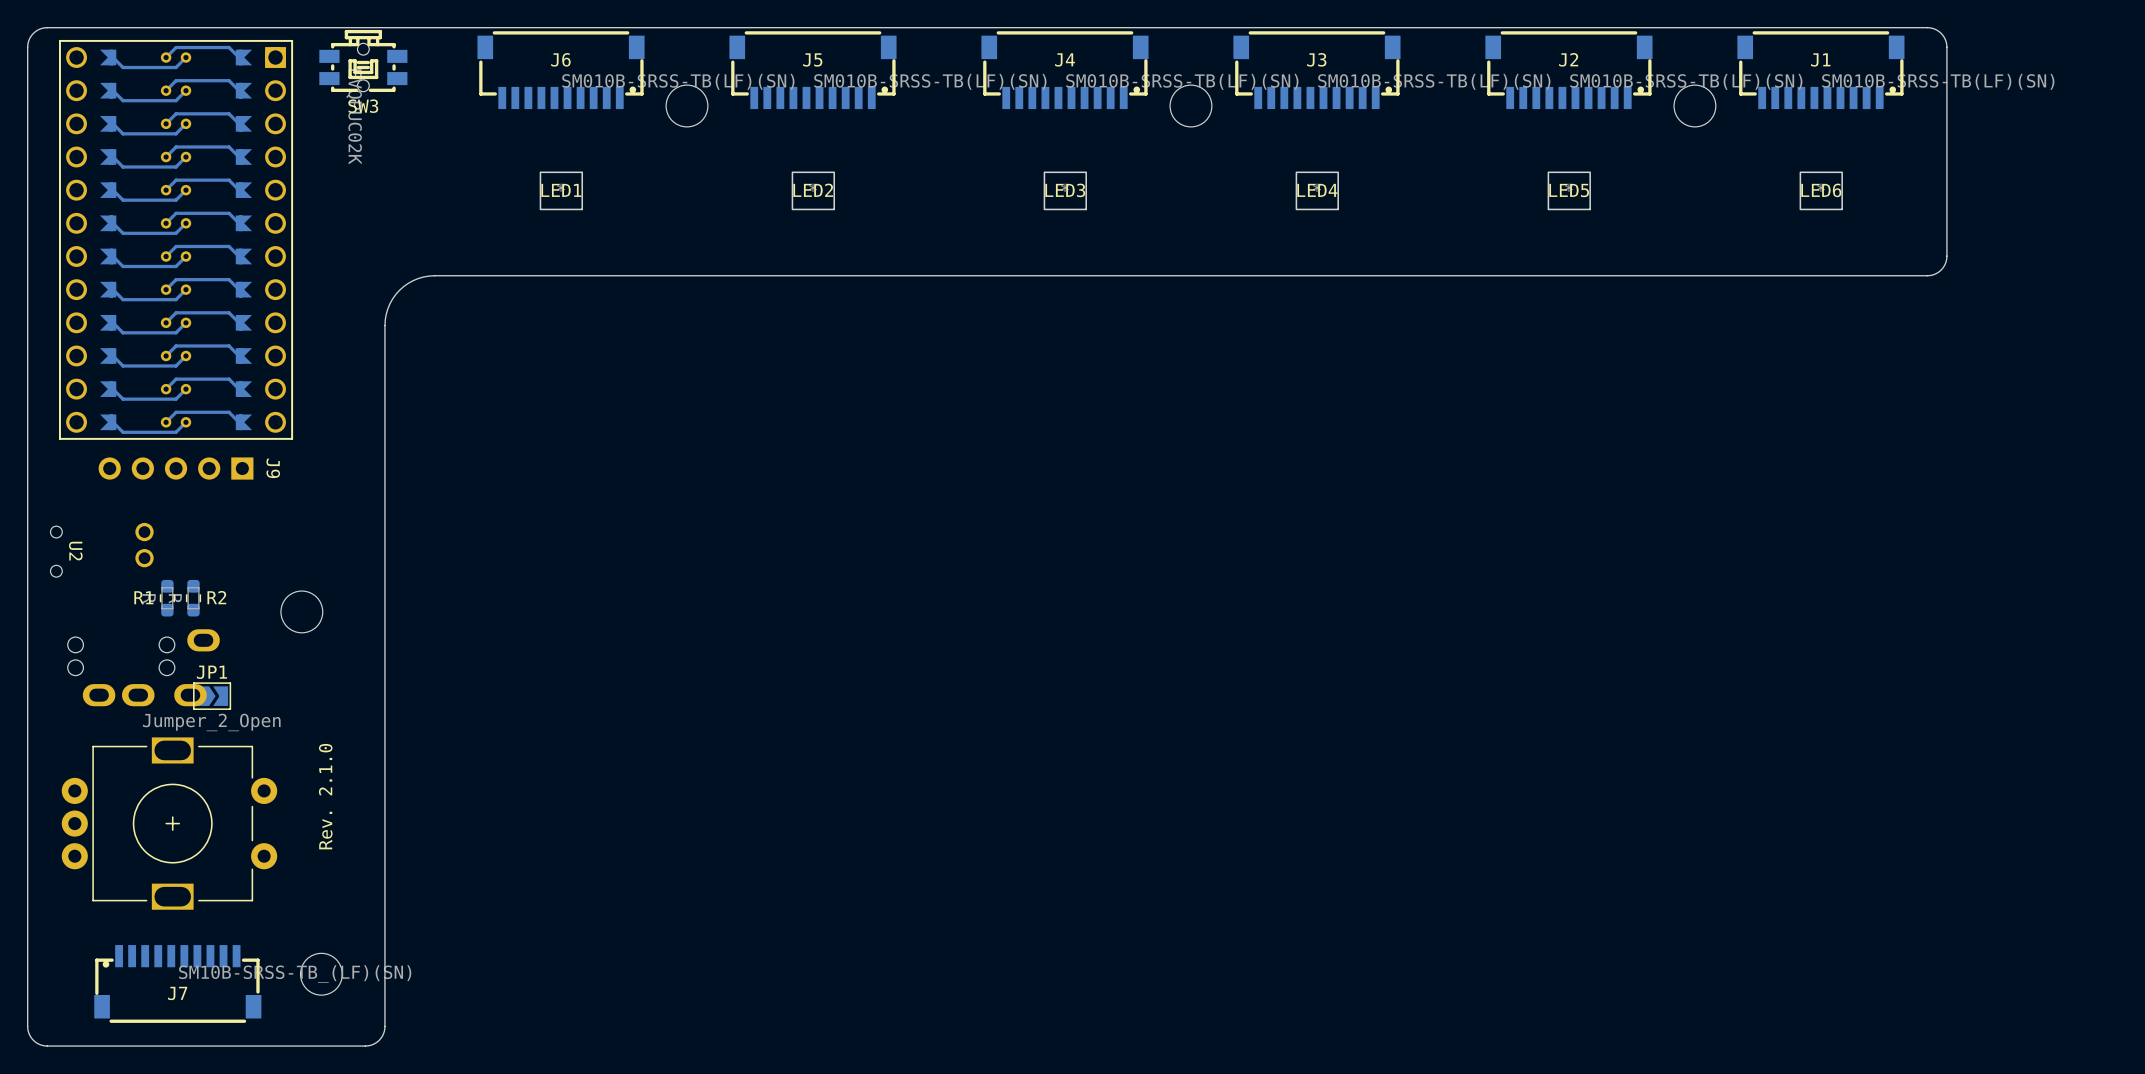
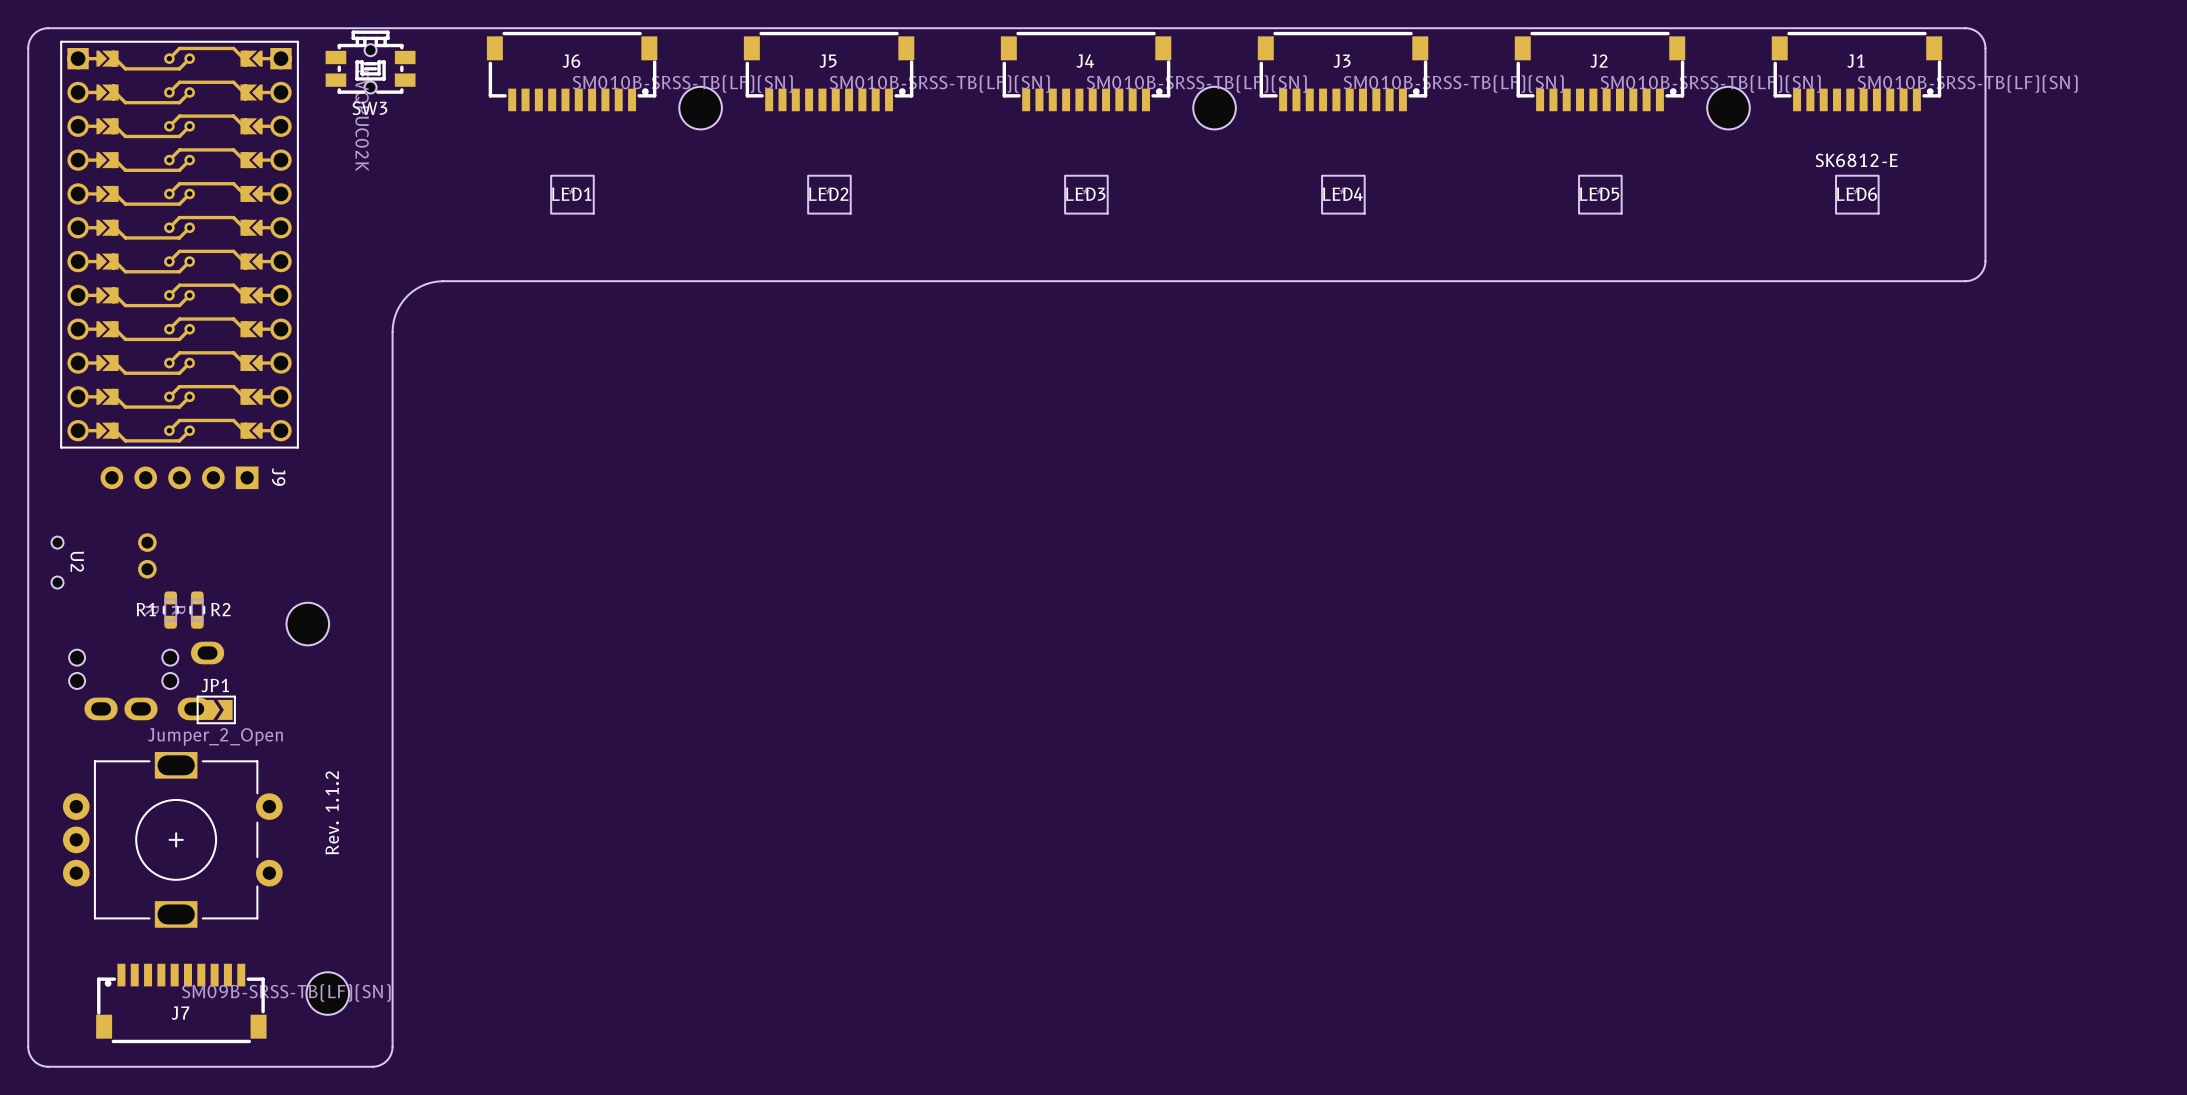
part footprint: [58, 39, 294, 440] -> [60, 40, 299, 449]
LED6 value: none -> SK6812-E (1856, 160)
text: Rev. 2.1.0 (325, 796) -> Rev. 1.1.2 (332, 812)
J7 value: SM10B-SRSS-TB_(LF)(SN) (295, 974) -> SM09B-SRSS-TB(LF)(SN) (286, 992)

